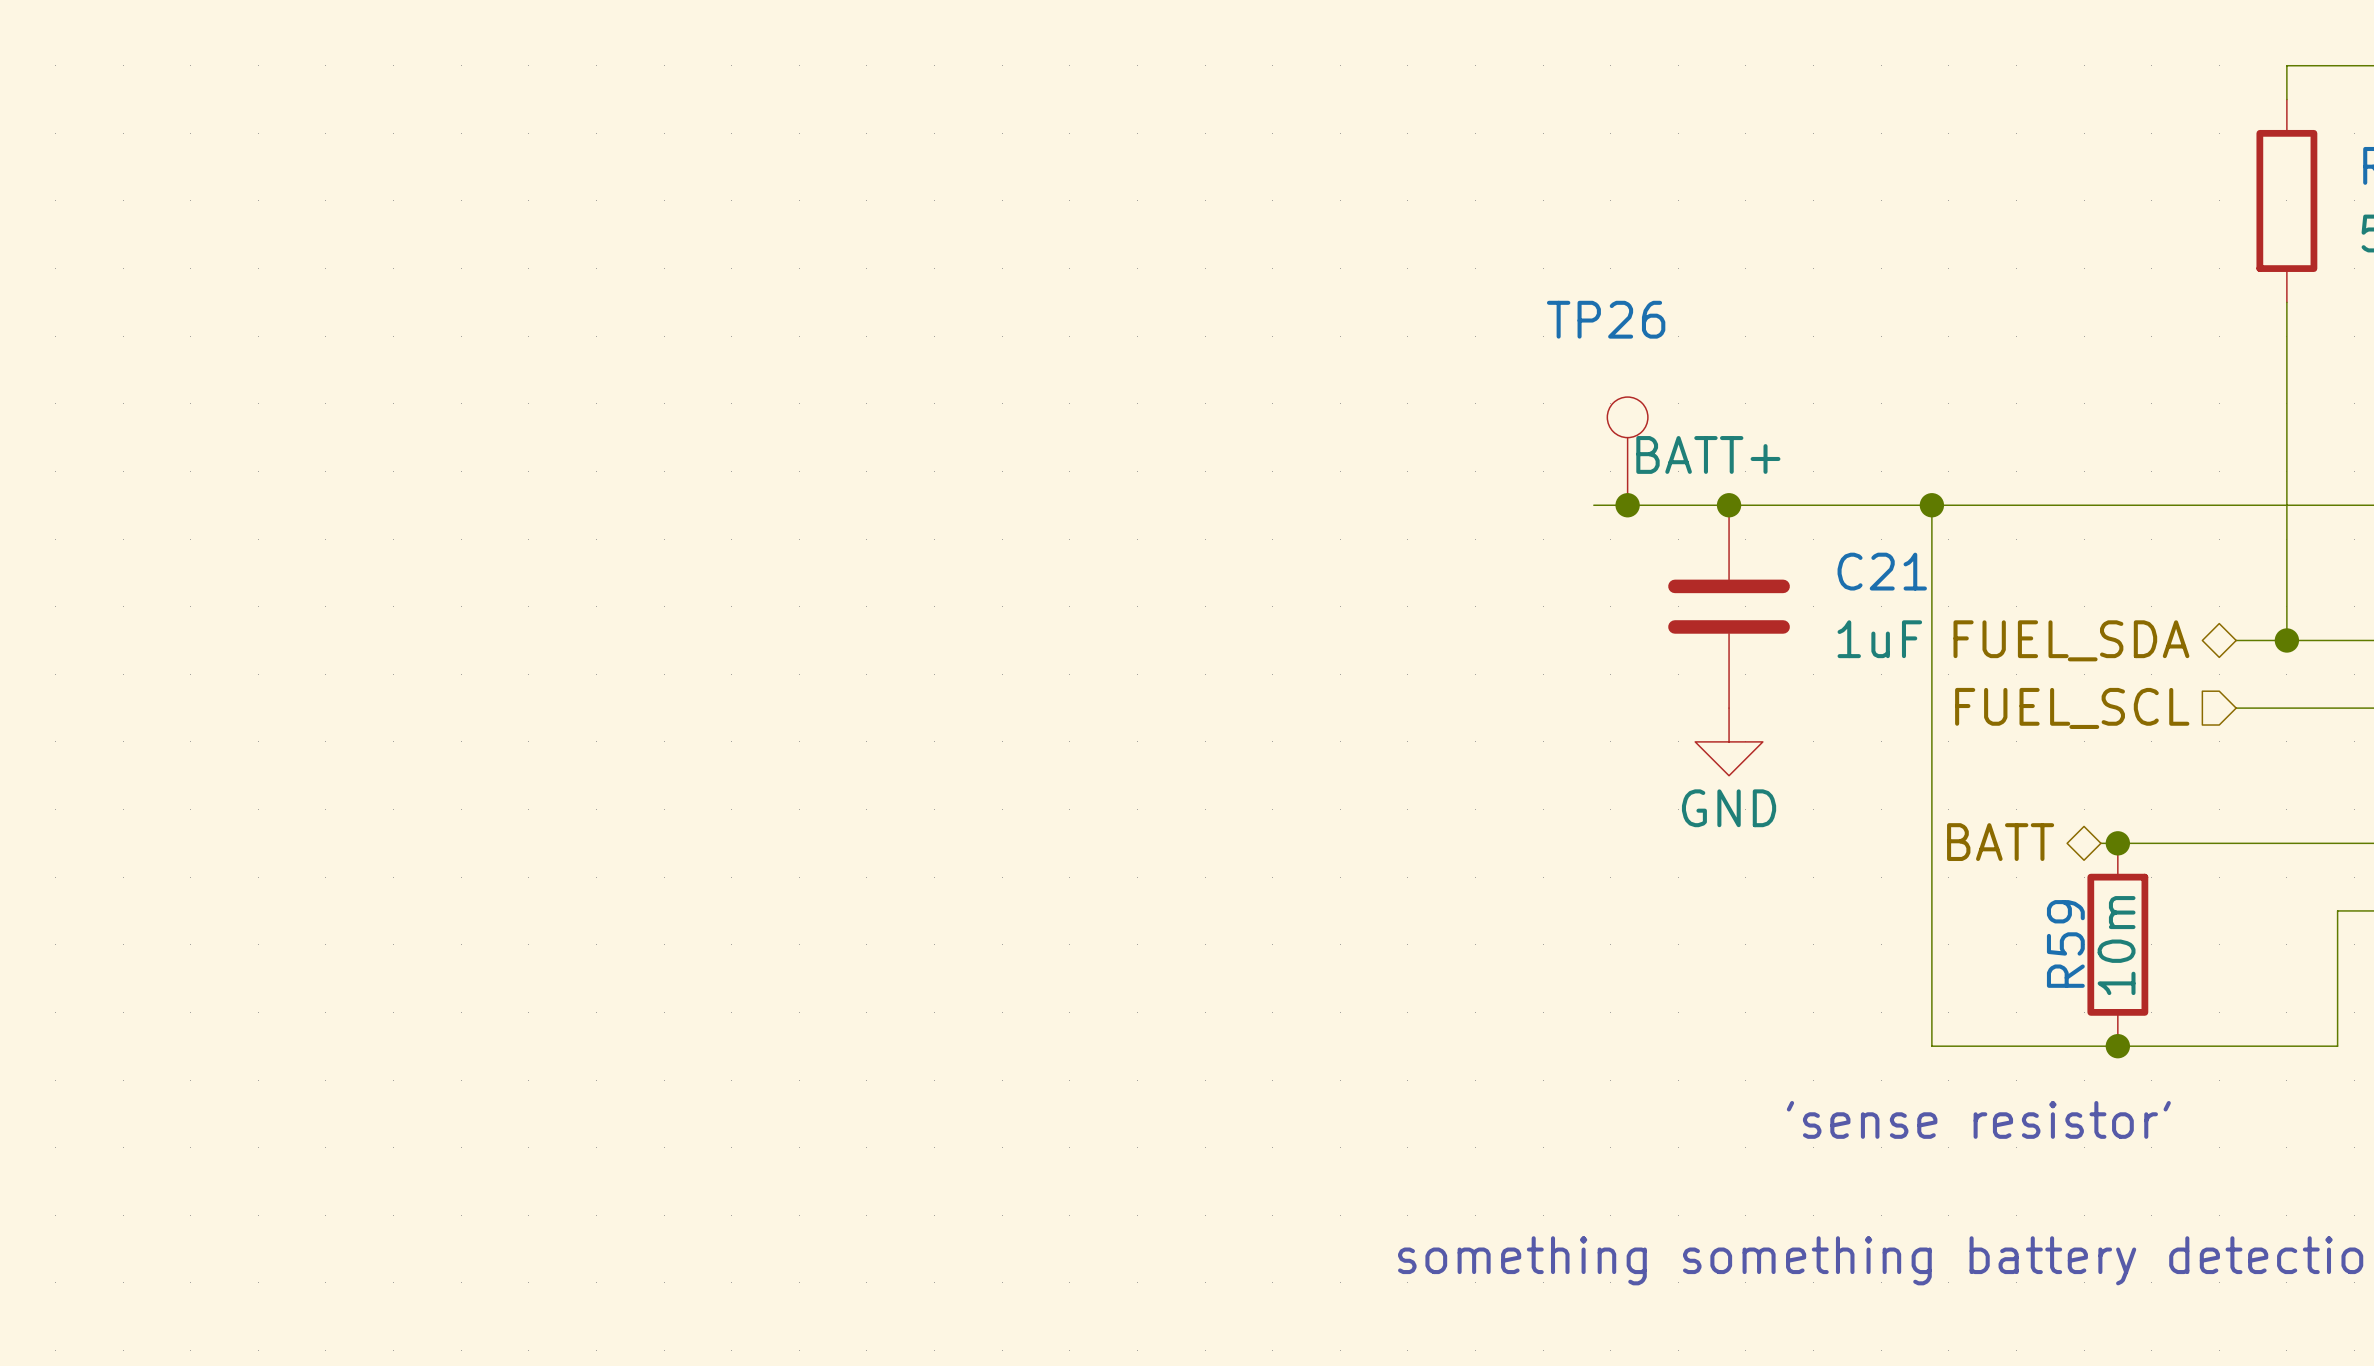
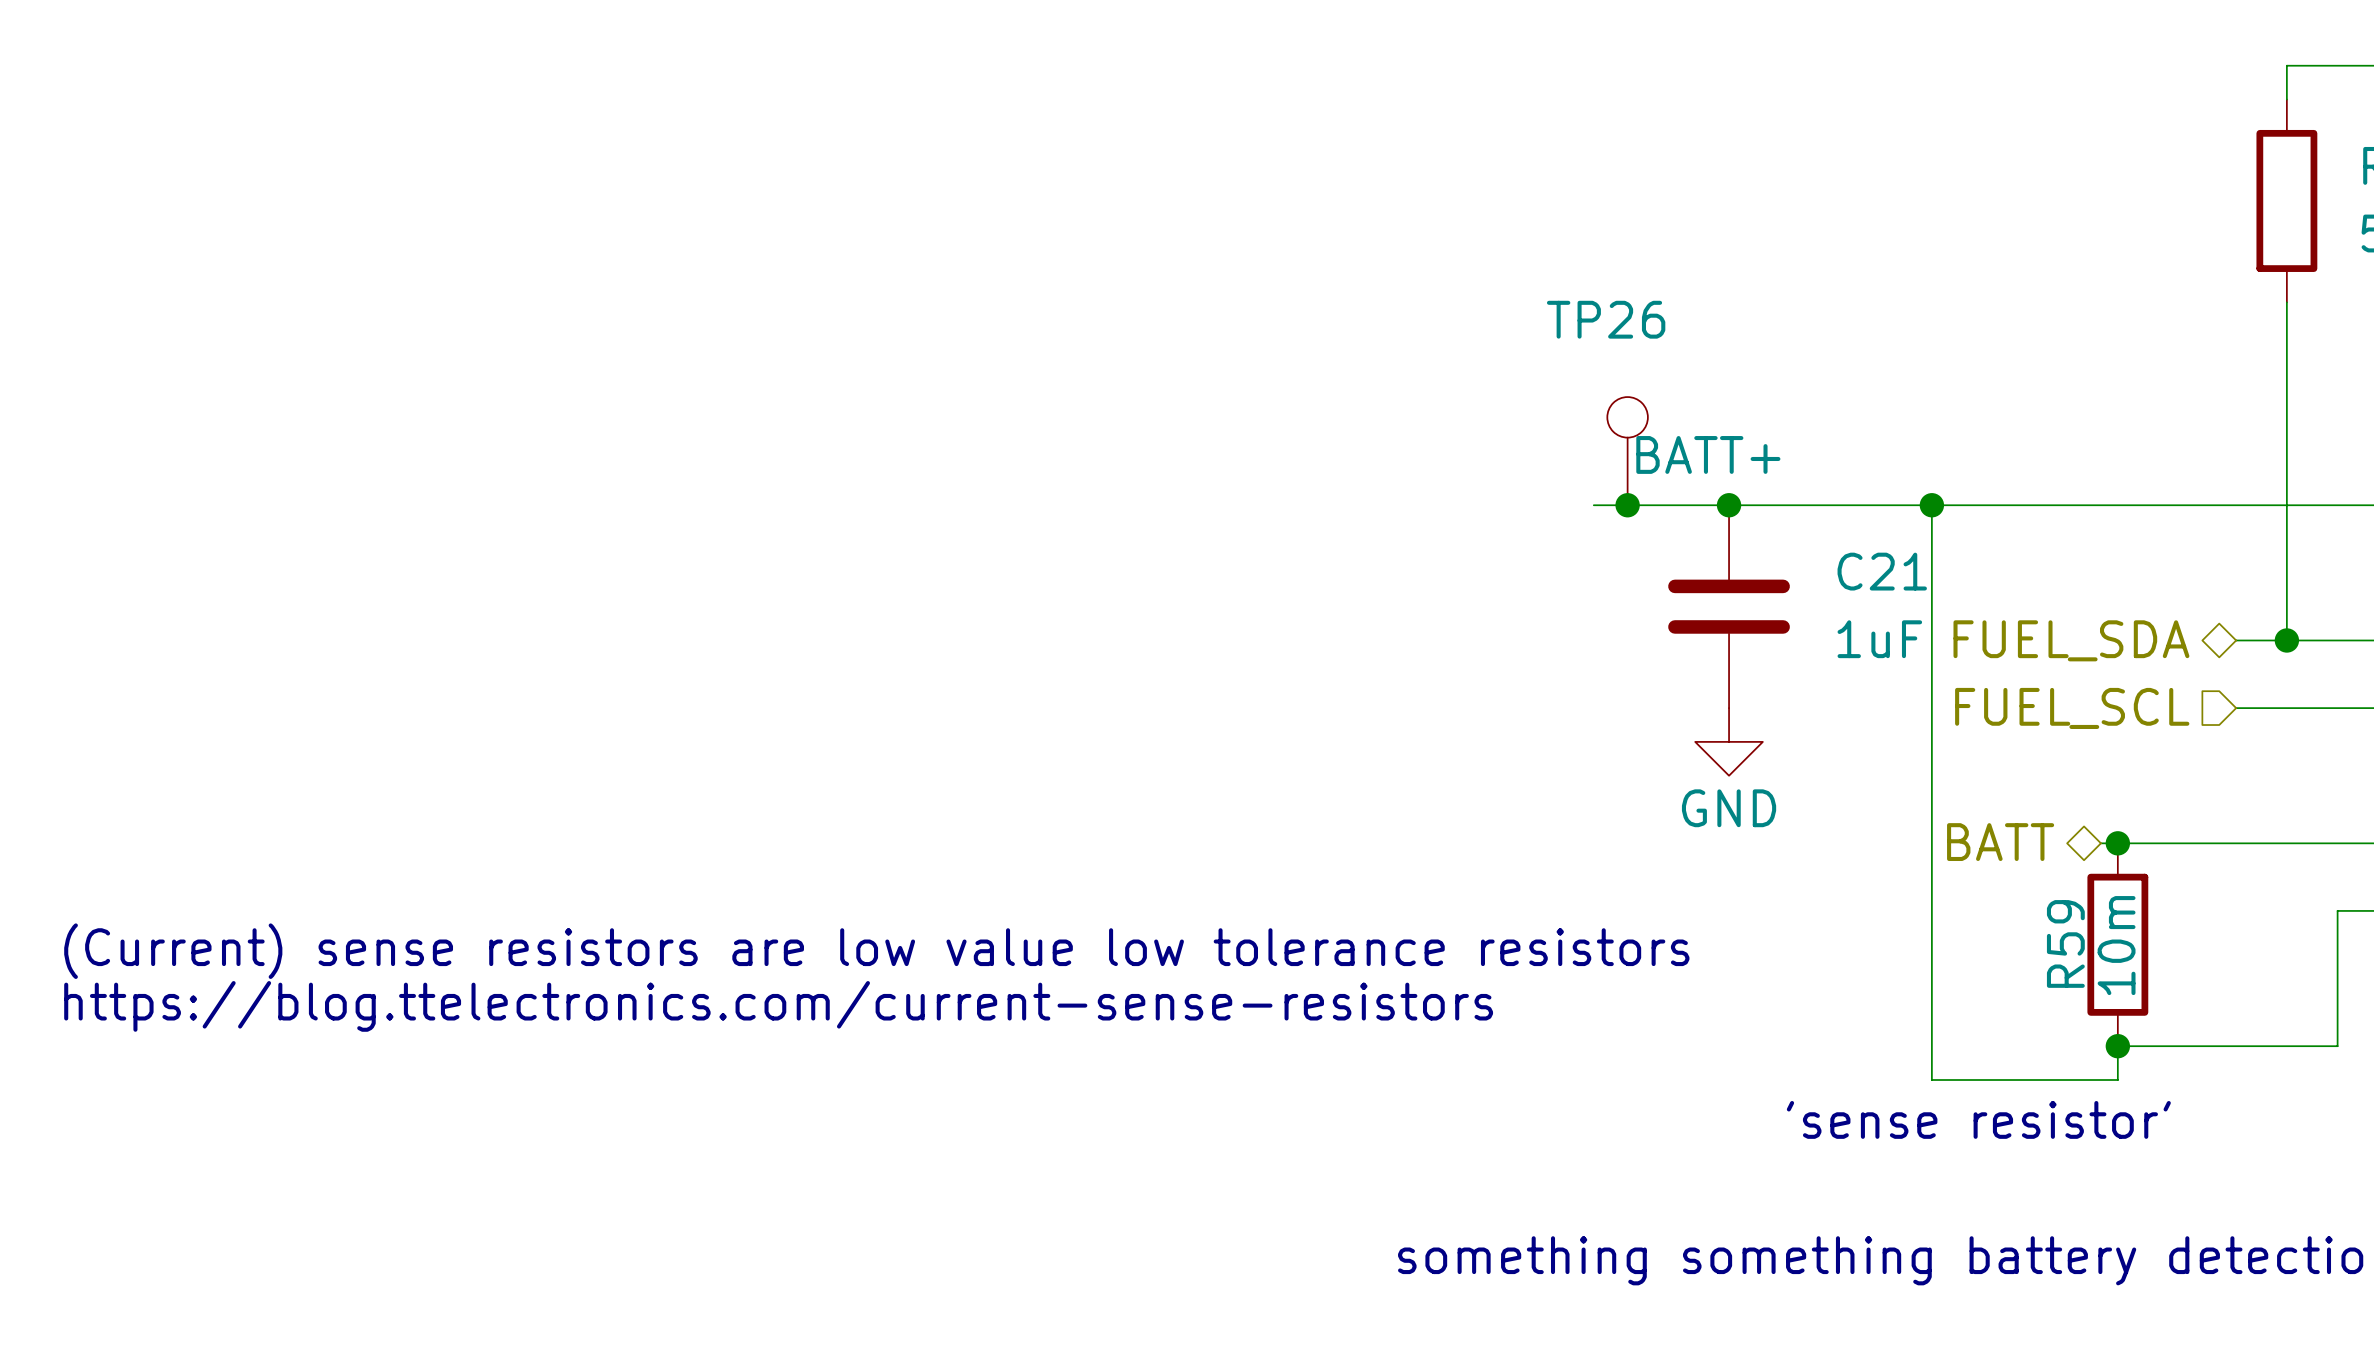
text: none -> (Current) sense resistors are low value low tolerance resistors (876, 951)
text: none -> https://blog.ttelectronics.com/current-sense-resistors (778, 1006)
wire: (1931, 1046) (2117, 1046) -> (1931, 1046) (1931, 1080) (2117, 1080) (2117, 1046)

